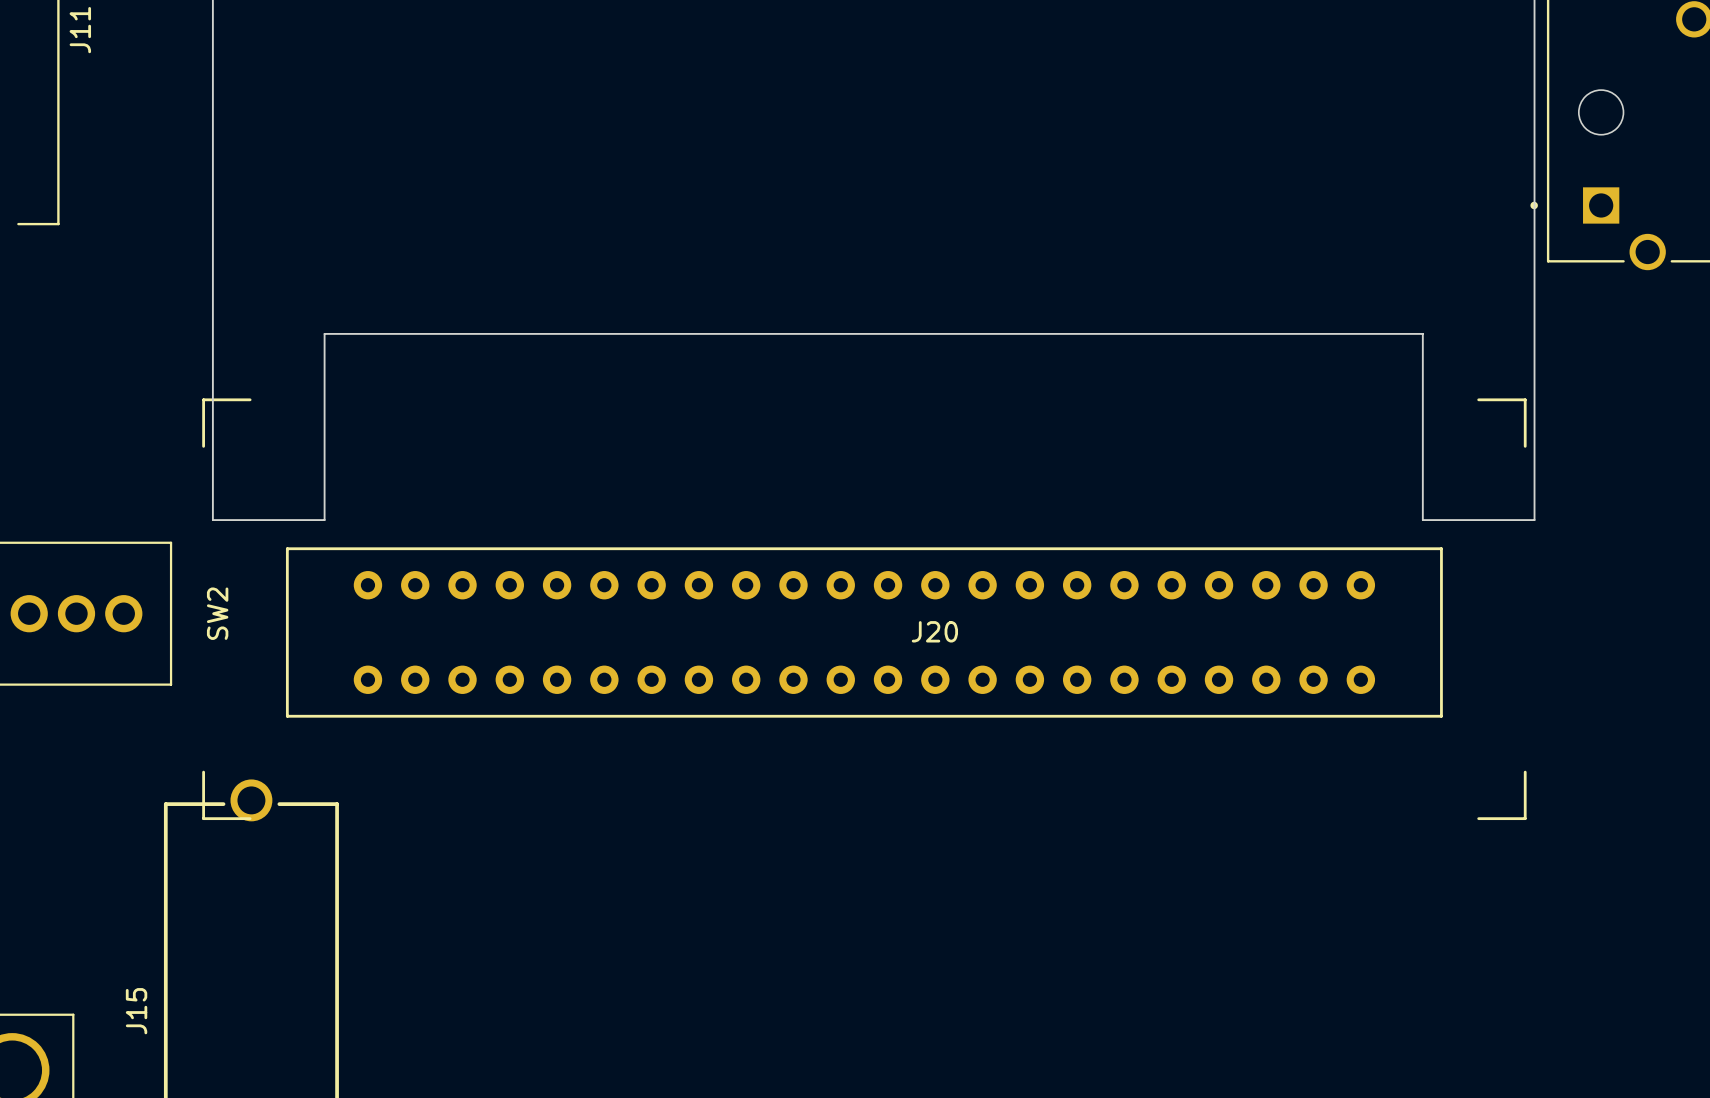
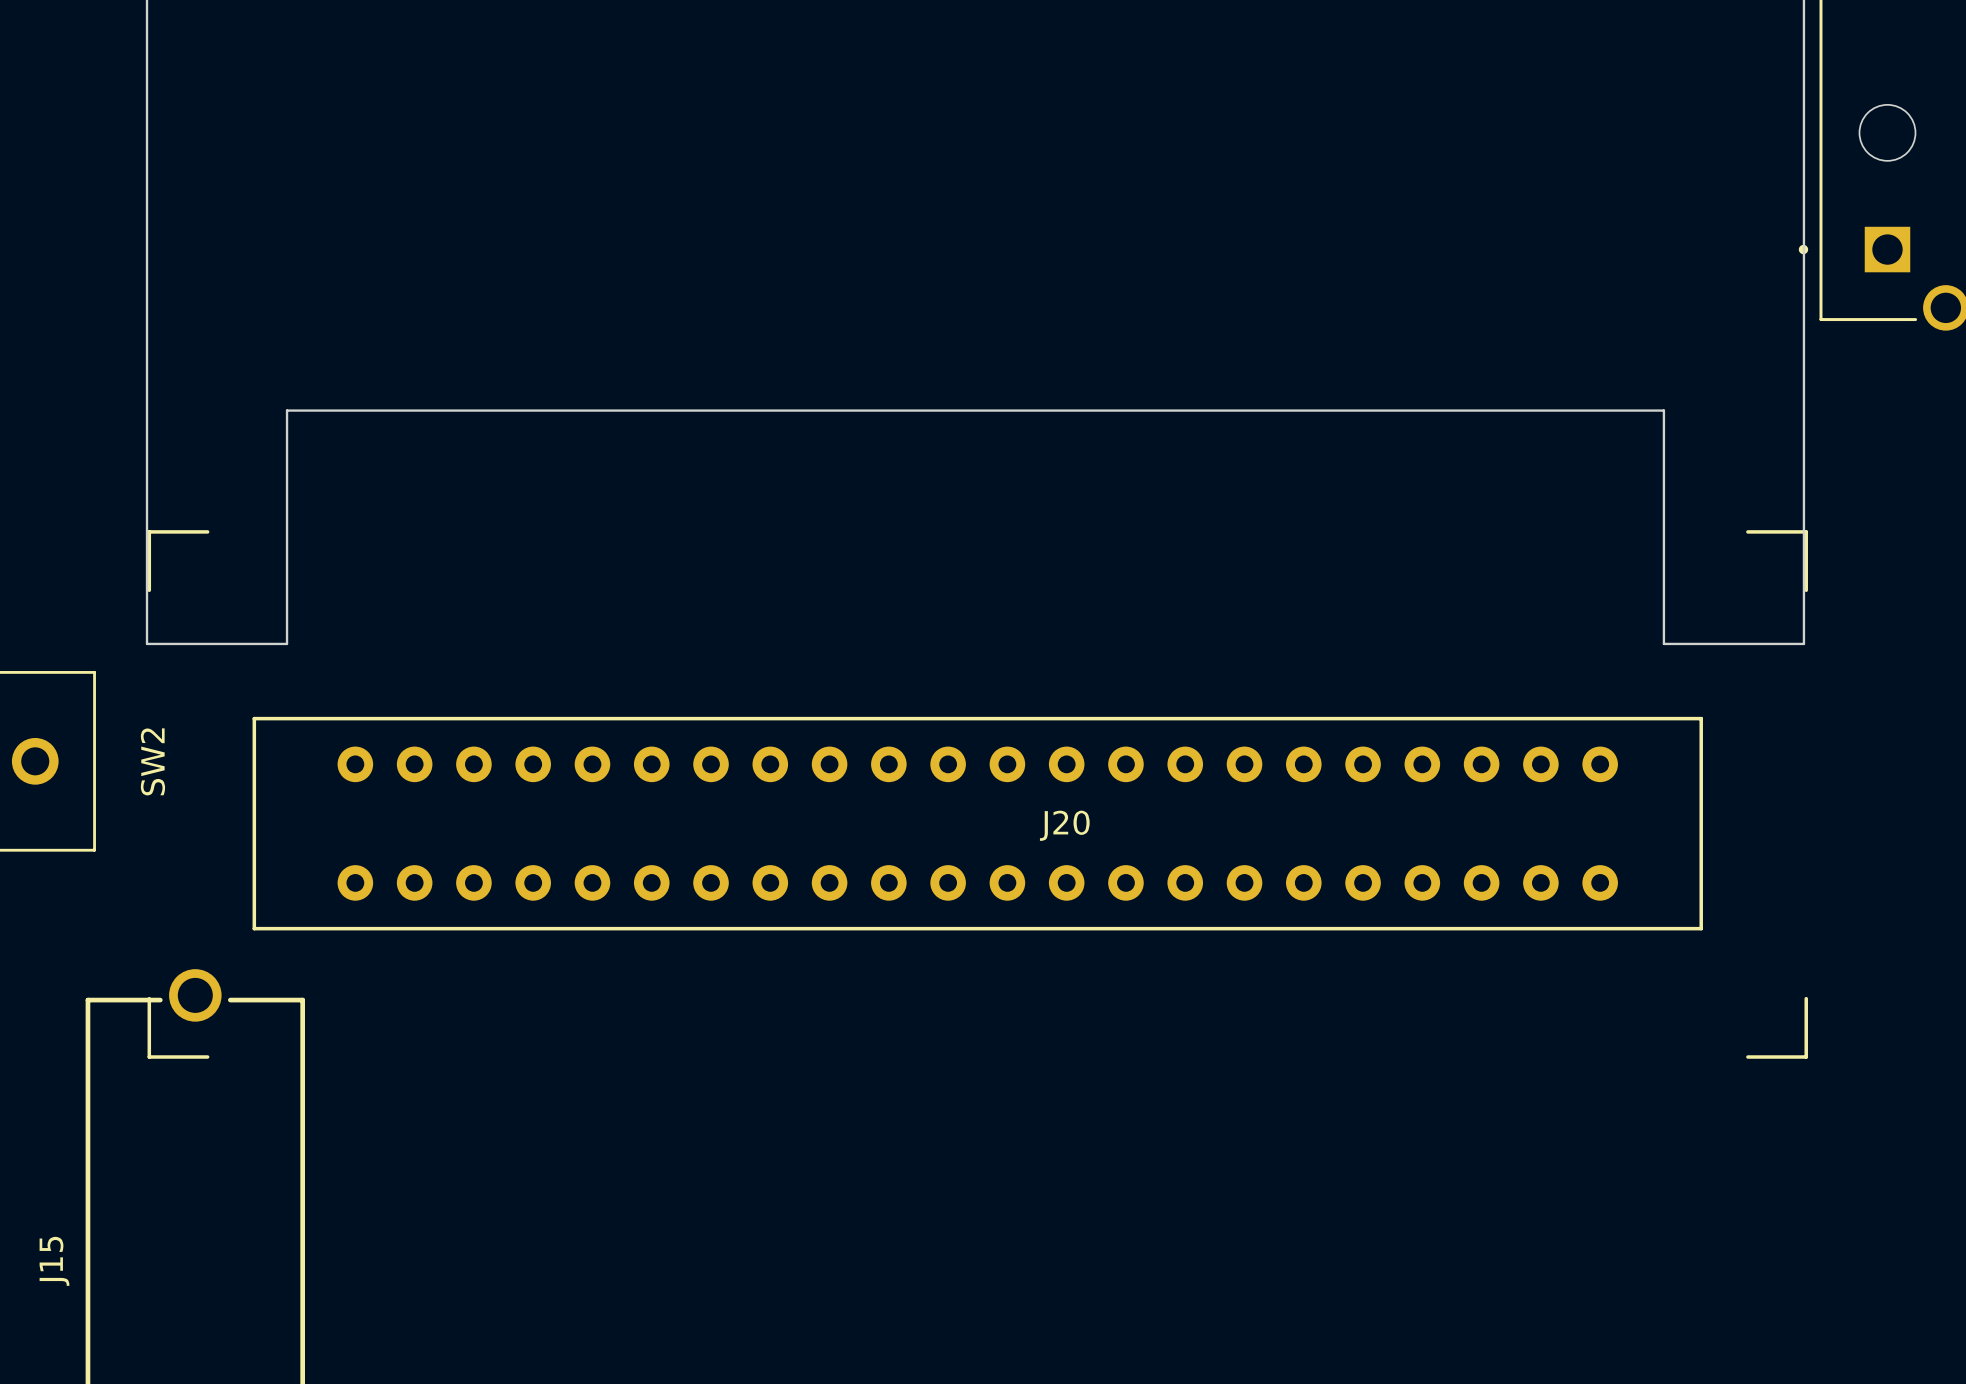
J20 position: (864, 609) -> (977, 794)

